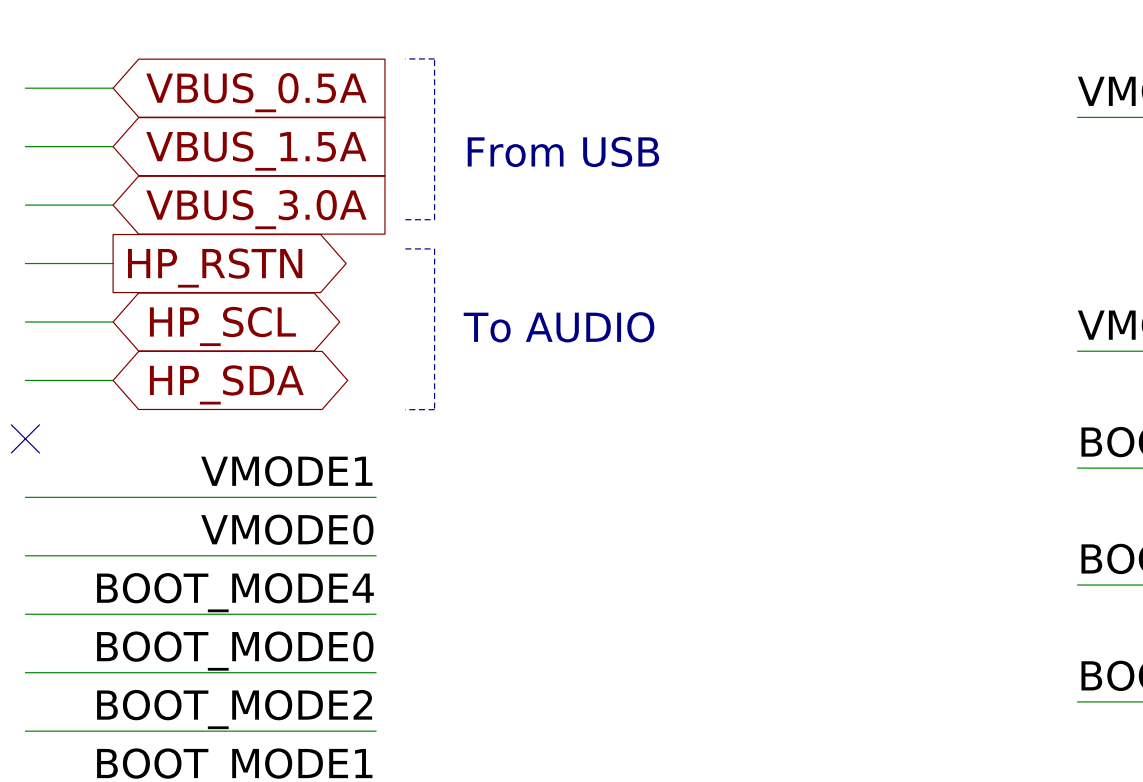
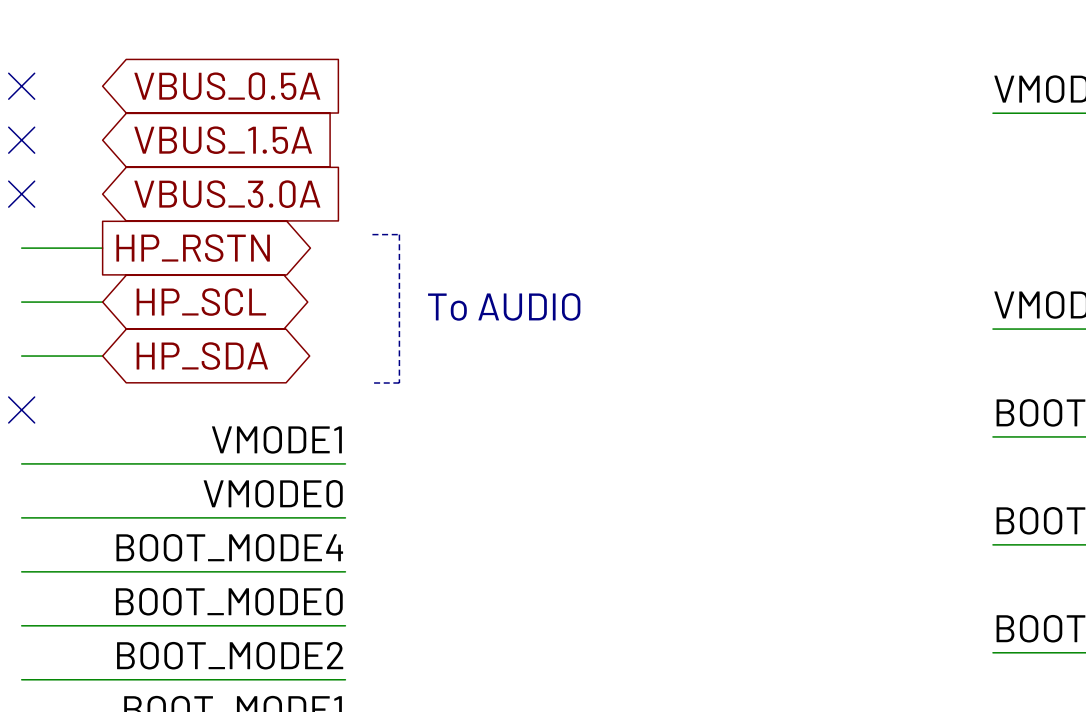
line: (405, 58) (434, 58) (434, 219) (405, 219) -> none
wire: (25, 88) (113, 88) -> none
no-connect mark: none -> (21, 86)
wire: (25, 146) (113, 146) -> none
no-connect mark: none -> (21, 140)
text: From USB (563, 151) -> none
wire: (25, 205) (113, 205) -> none
no-connect mark: none -> (21, 194)

